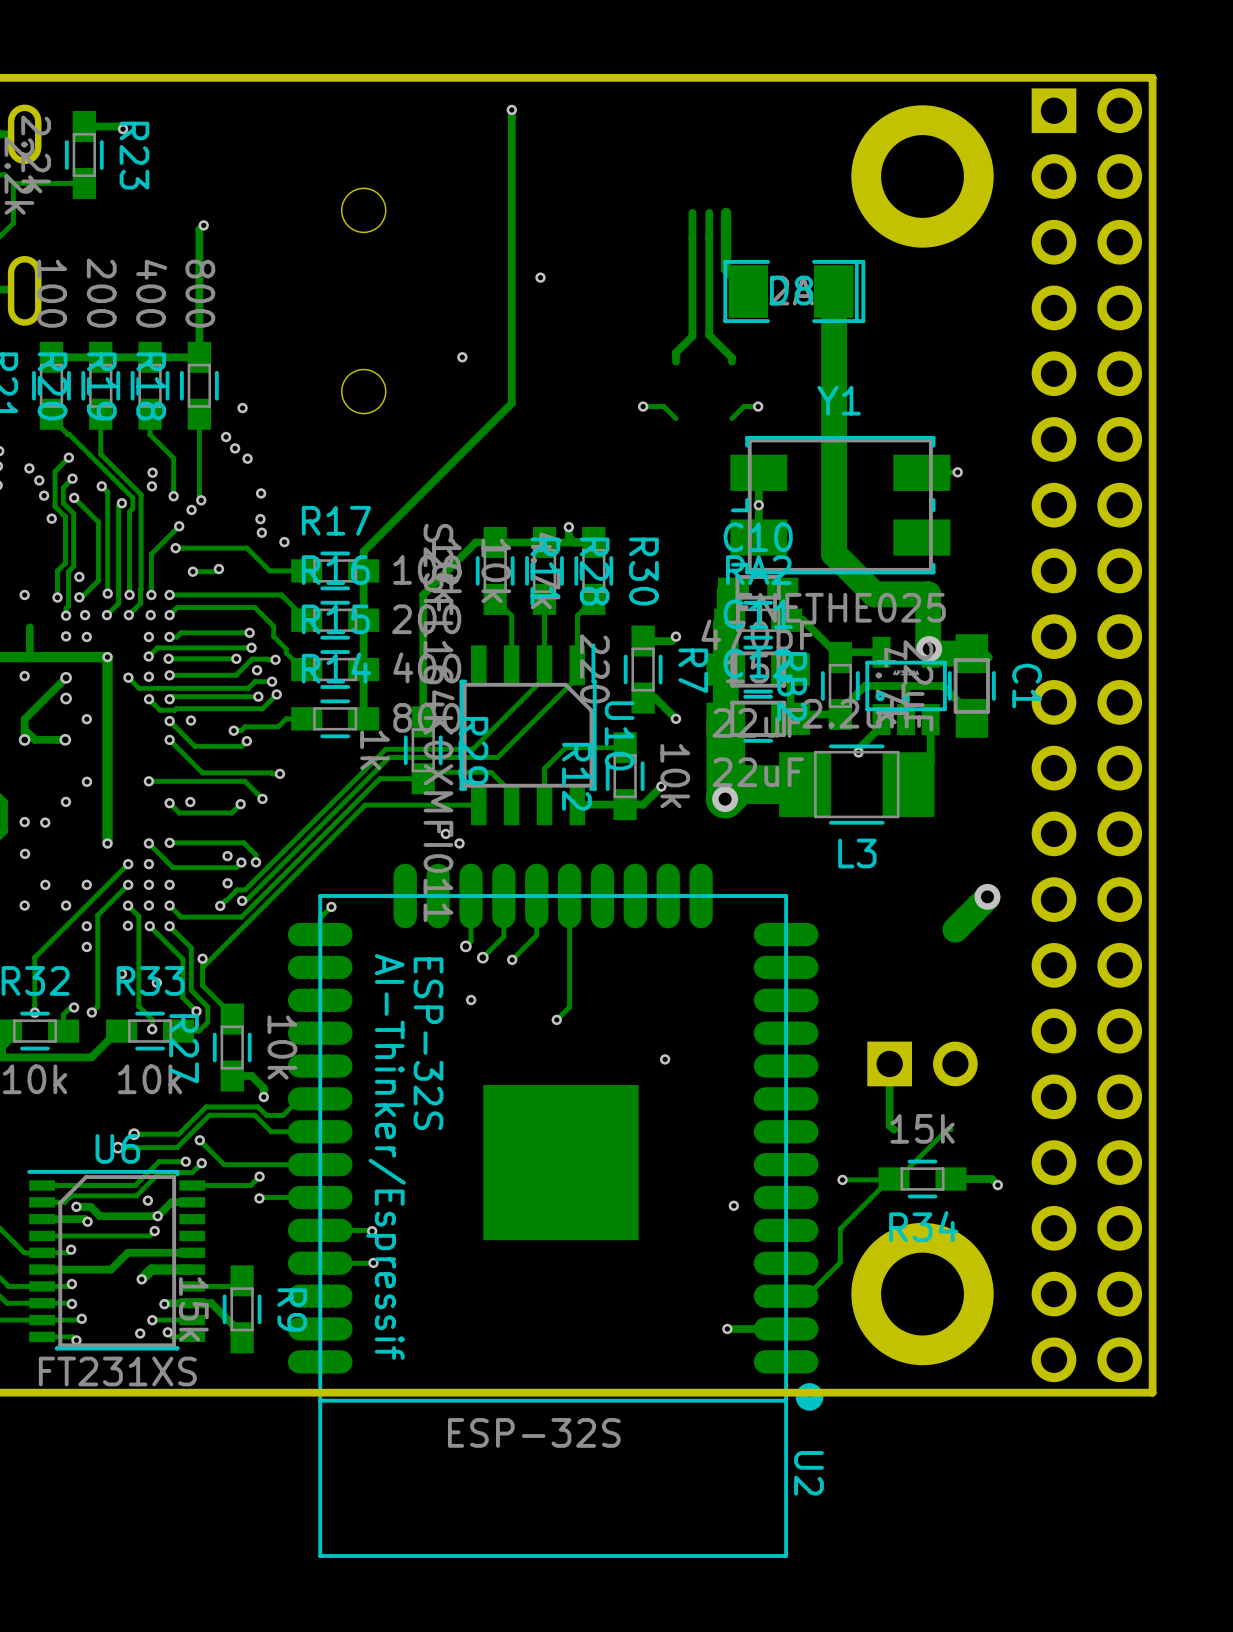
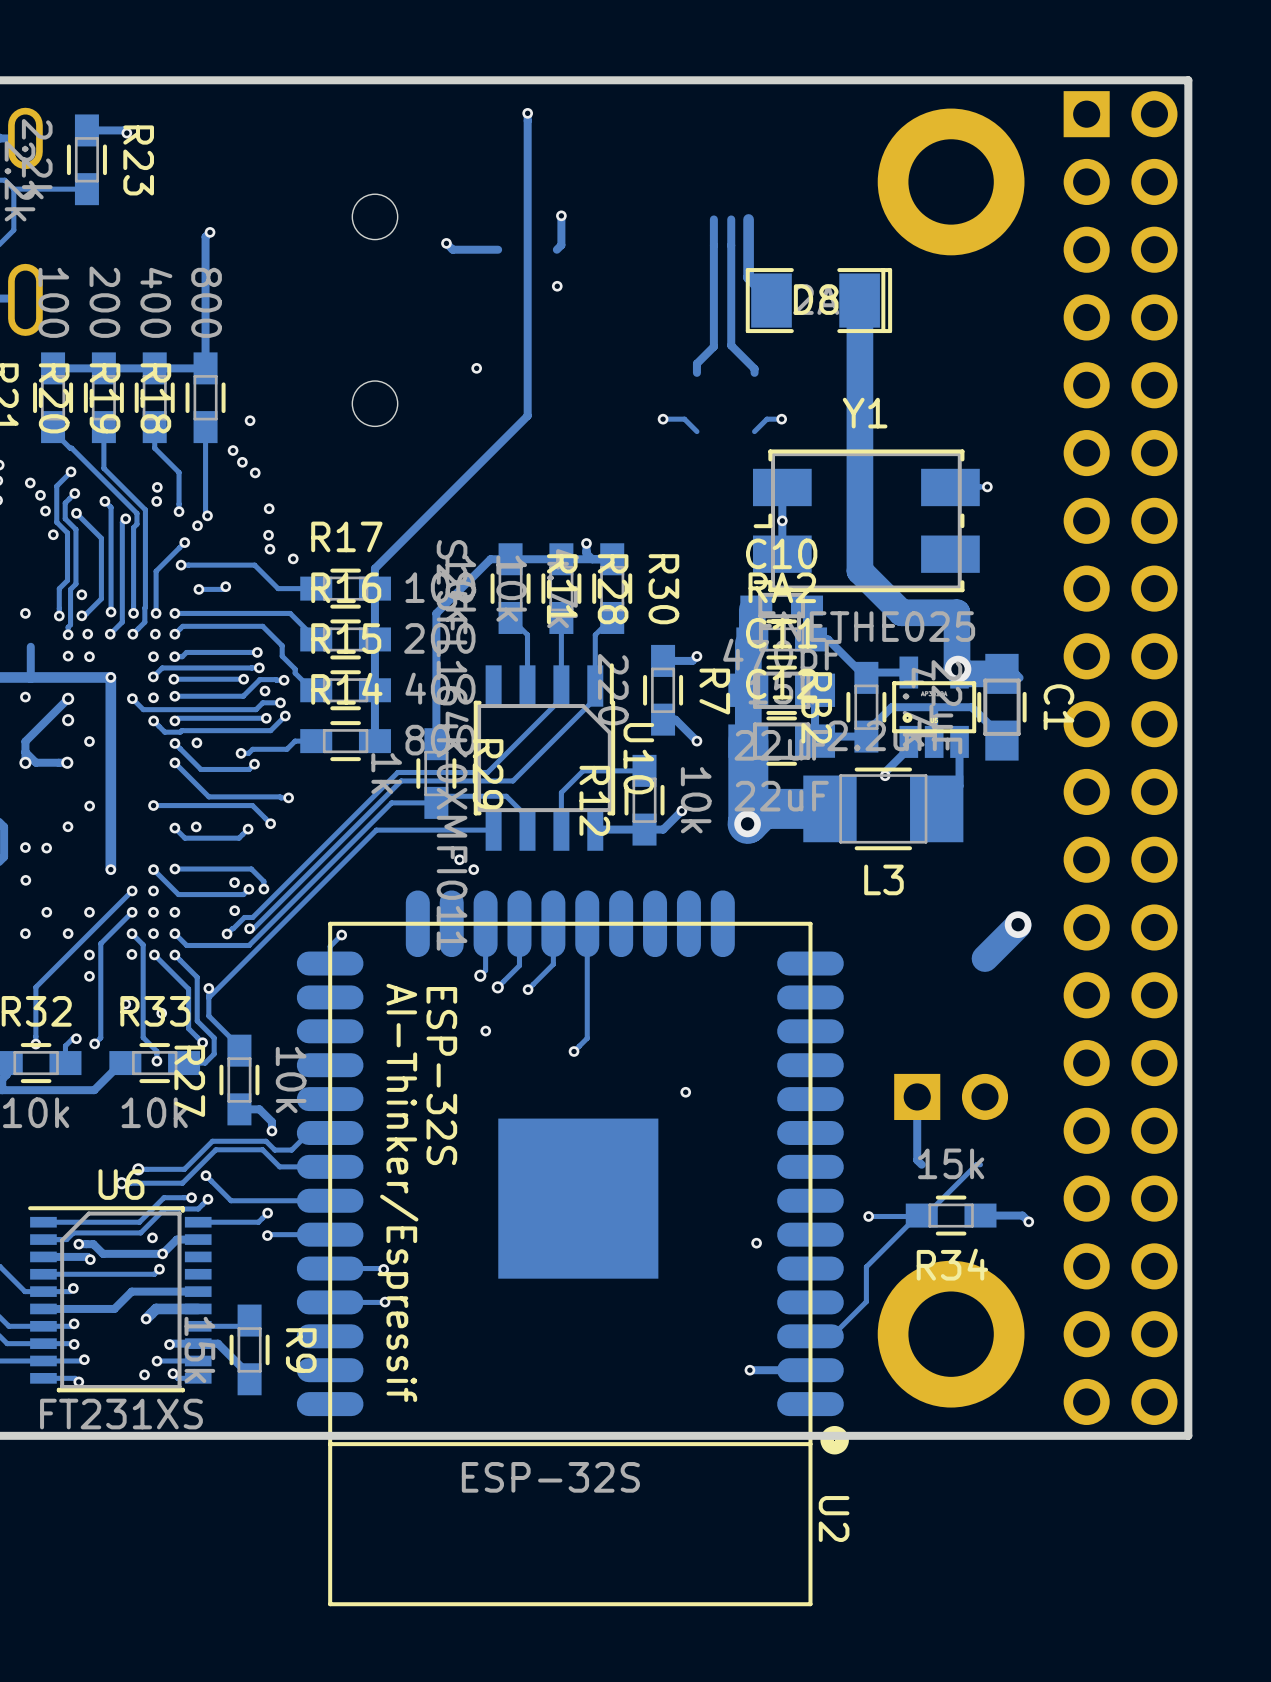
track: none -> (561, 215) (561, 245) (556, 249)
via: none -> (561, 215)
track: none -> (446, 243) (452, 249) (498, 249)
via: none -> (446, 243)

